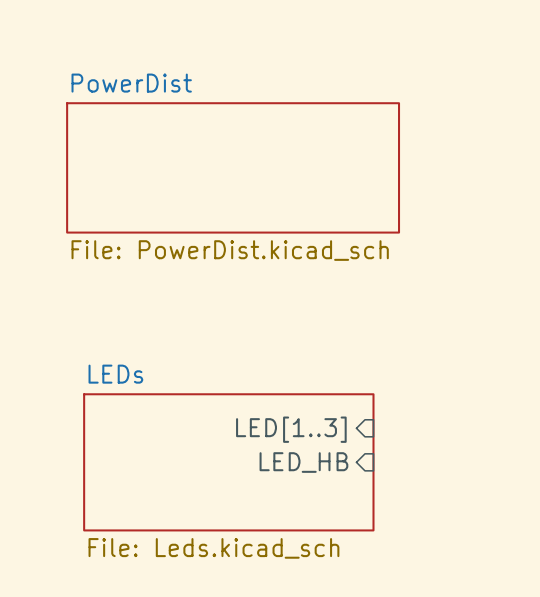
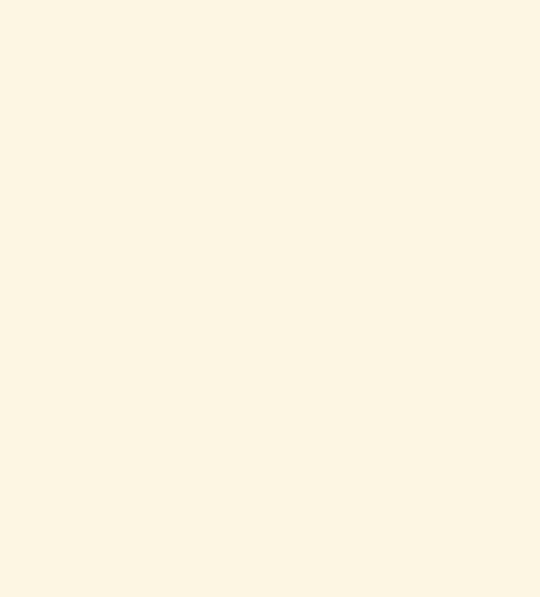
sheet PowerDist: File: PowerDist.kicad_sch (233, 167) -> none
sheet pin: LED[1..3] (291, 429) -> none
sheet LEDs: File: Leds.kicad_sch (228, 462) -> none
sheet pin: LED_HB (303, 462) -> none

